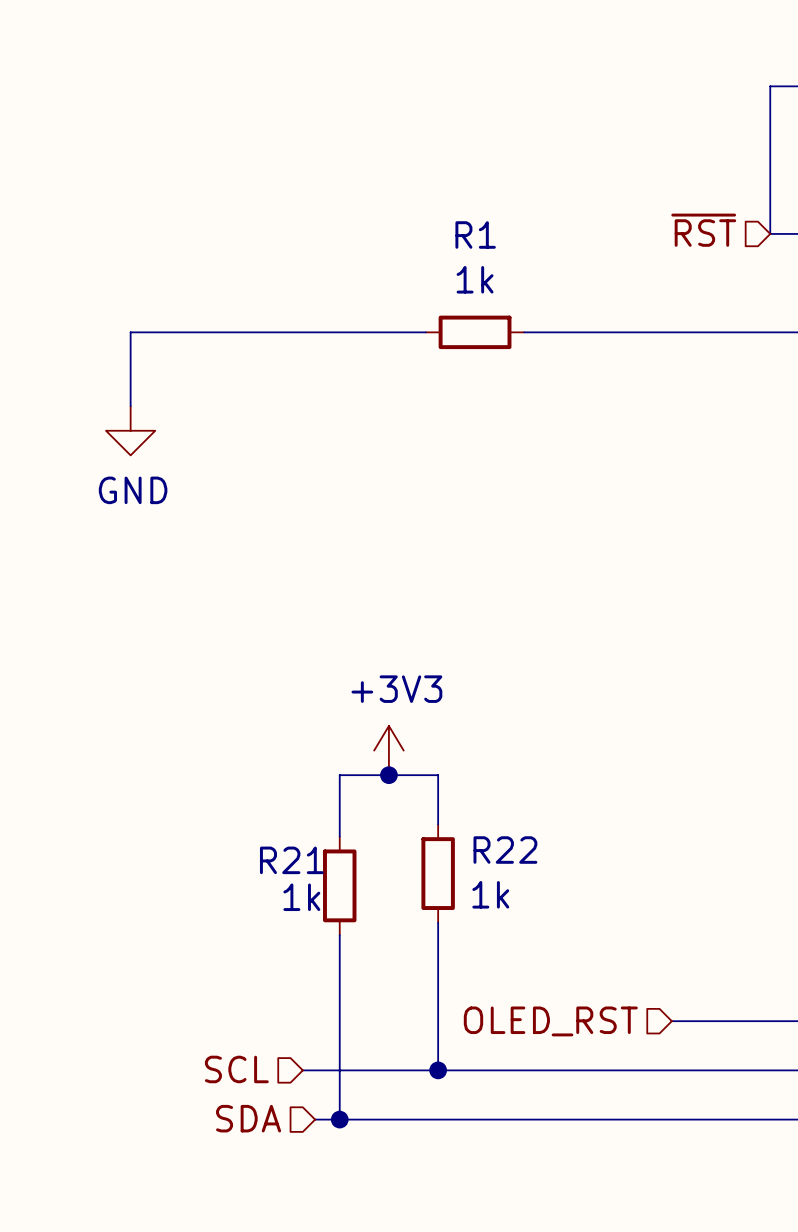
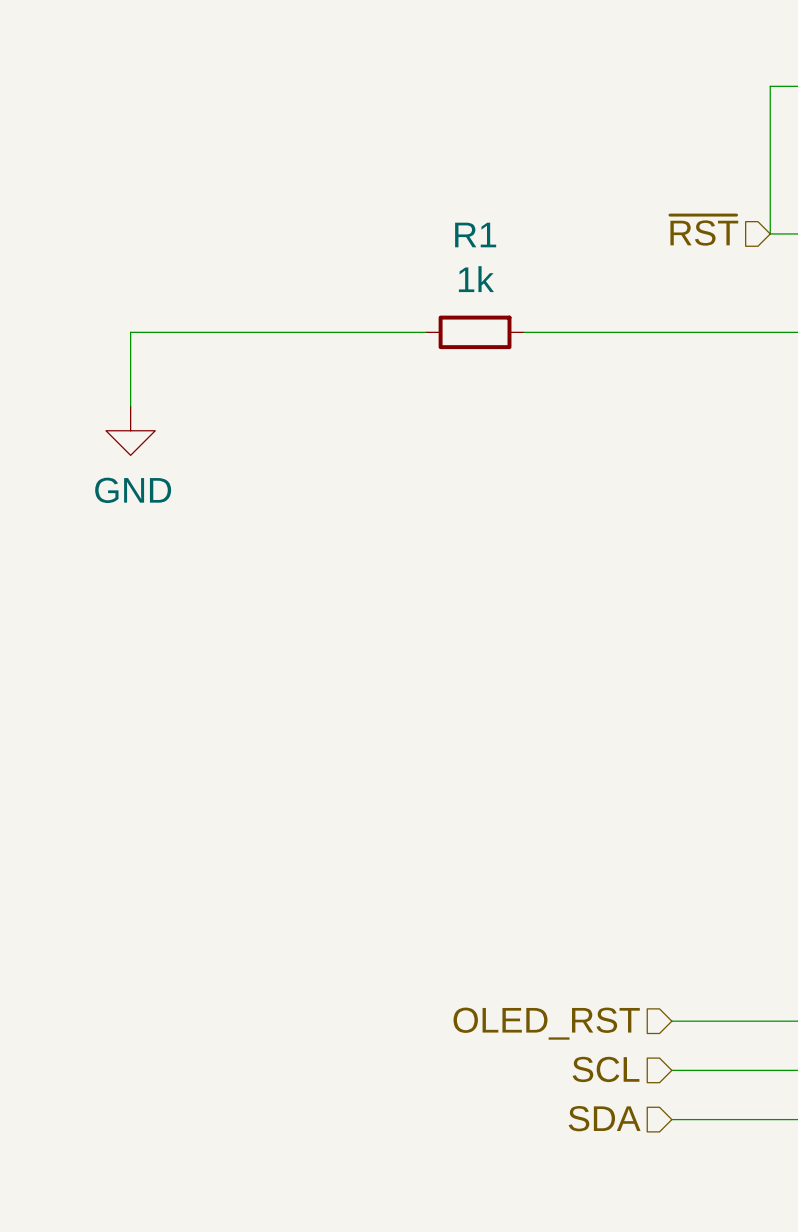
power symbol: +3V3 (388, 750) -> none
junction: (388, 775) -> none
wire: (438, 824) (438, 775) (339, 775) (339, 836) -> none
R22: 1k (438, 873) -> none
R21: 1k (339, 885) -> none
wire: (438, 922) (438, 1070) -> none
wire: (339, 935) (339, 1119) -> none
hierarchical label position: SCL (236, 1069) -> SCL (606, 1069)
wire: (302, 1070) (671, 1070) -> none
junction: (438, 1070) -> none
hierarchical label position: SDA (248, 1118) -> SDA (604, 1118)
wire: (315, 1119) (671, 1119) -> none
junction: (339, 1119) -> none

